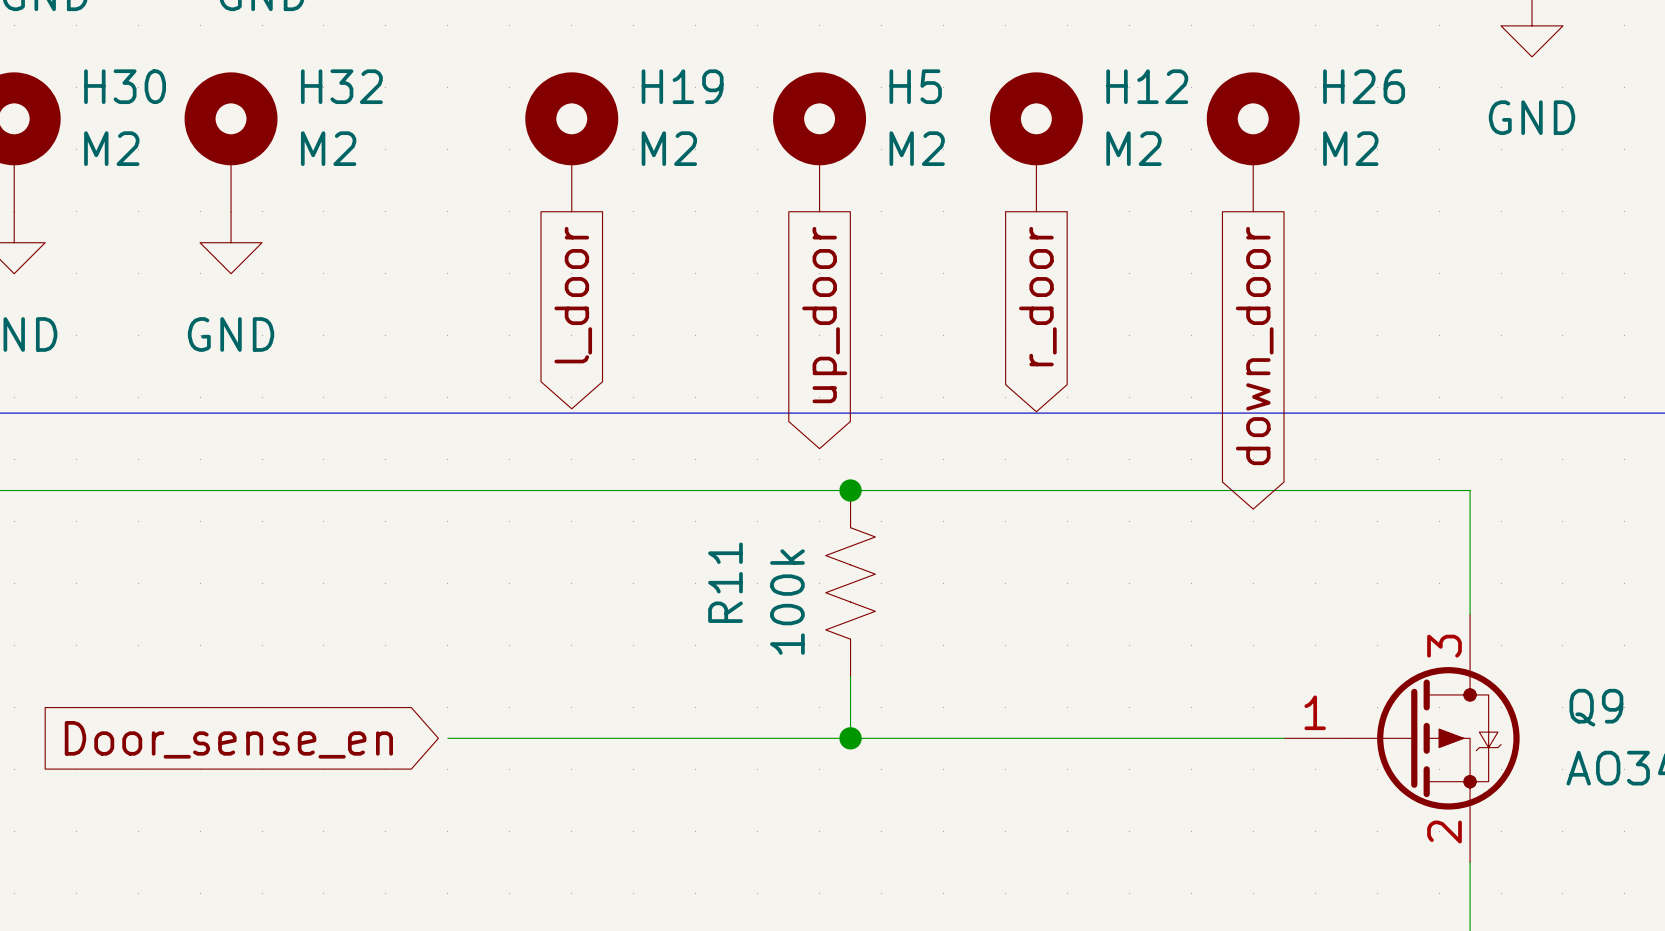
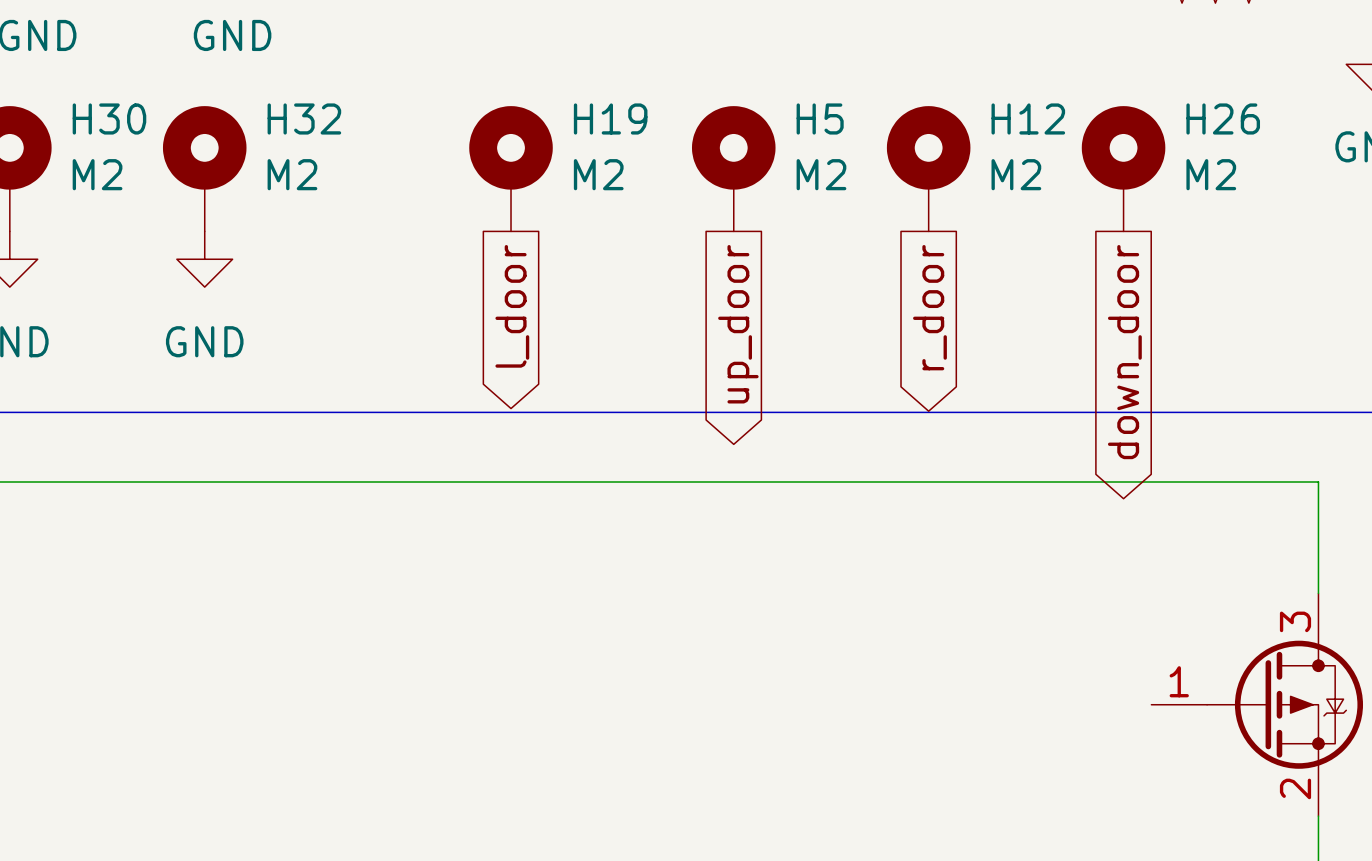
junction: (850, 490) -> none
R11: 100k (850, 583) -> none
wire: (850, 676) (850, 738) -> none
wire: (447, 738) (1284, 738) -> none
junction: (850, 738) -> none
global label: Door_sense_en (228, 739) -> none

